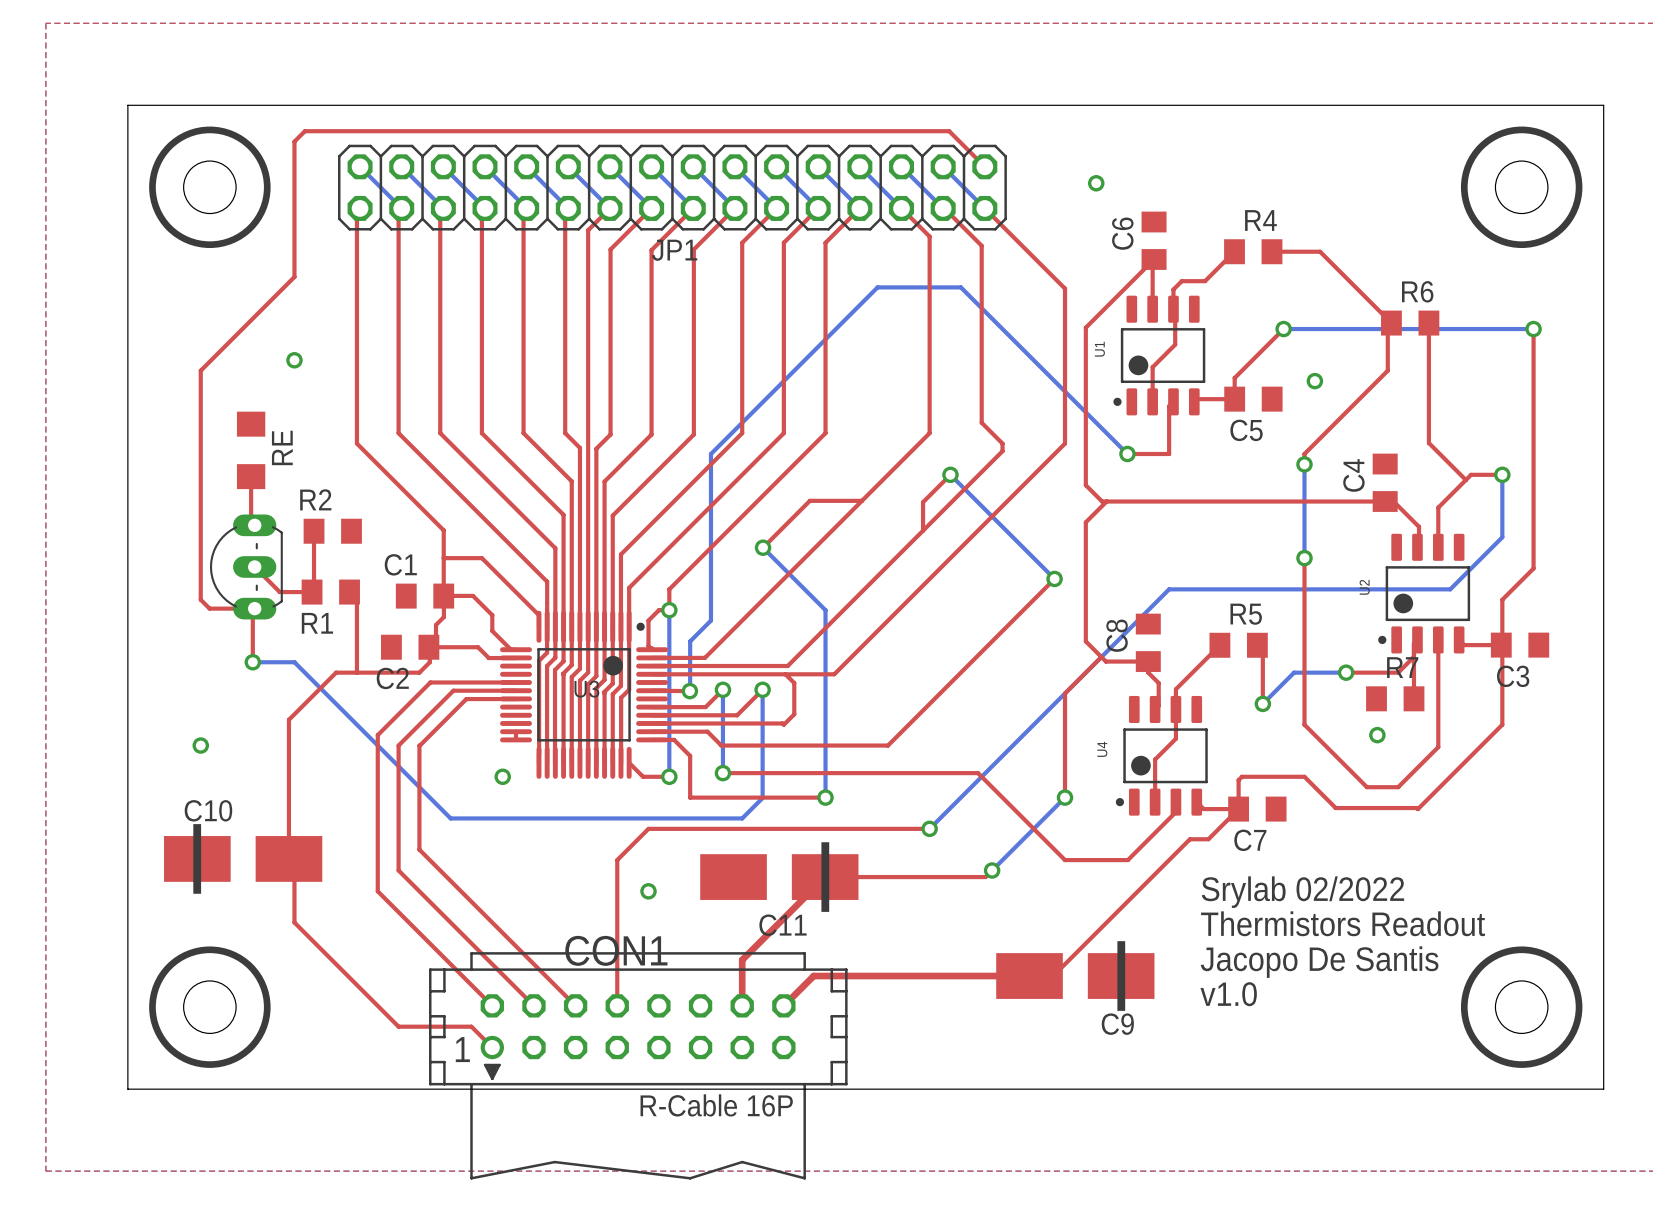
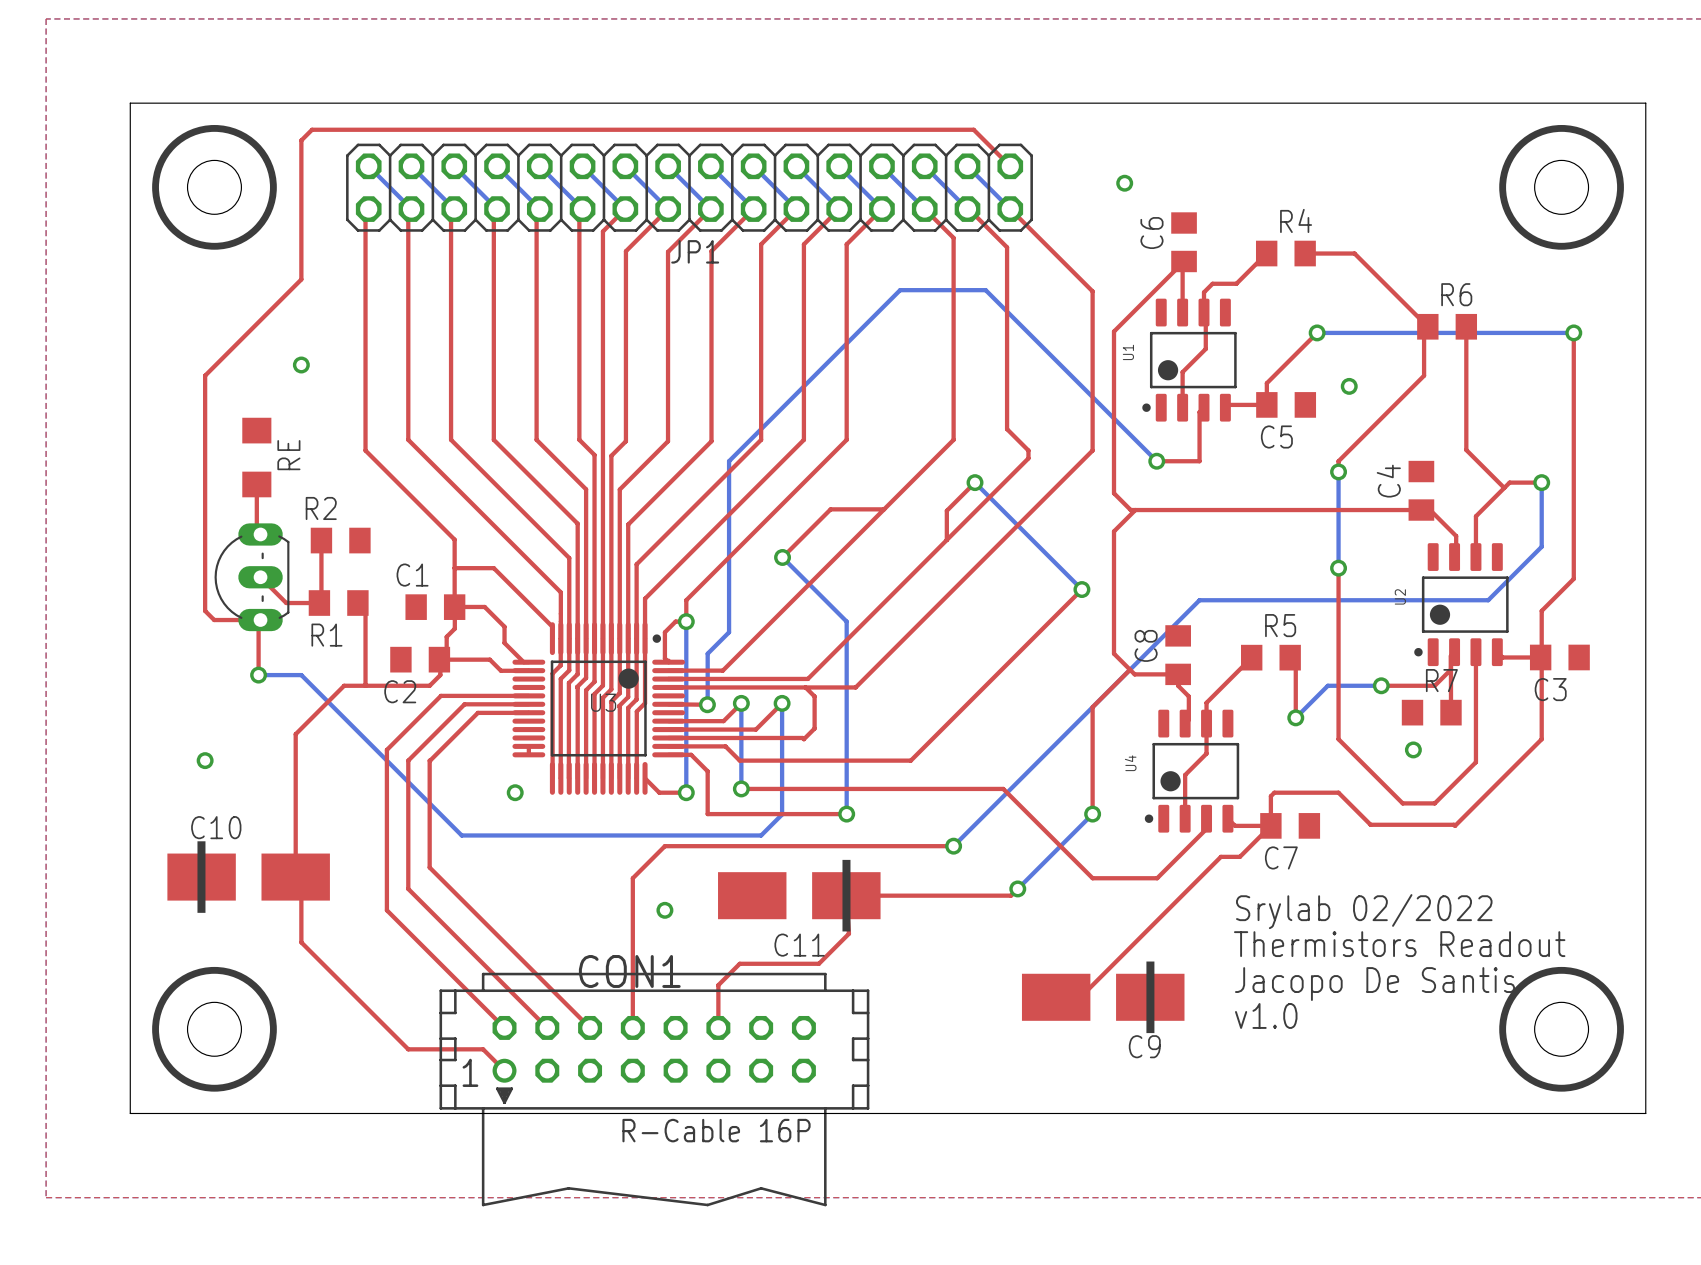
top track: (825, 877) (742, 960) (742, 1005) -> (846, 895) (848, 933) (818, 963) (739, 963) (718, 985) (718, 1027)
top track: (1029, 976) (813, 976) (783, 1005) -> none

